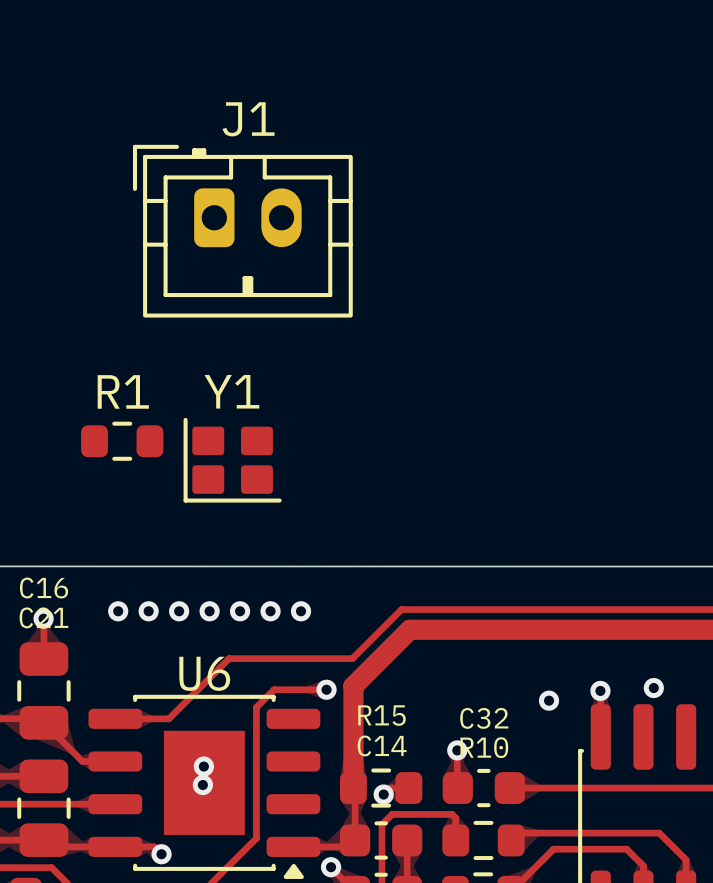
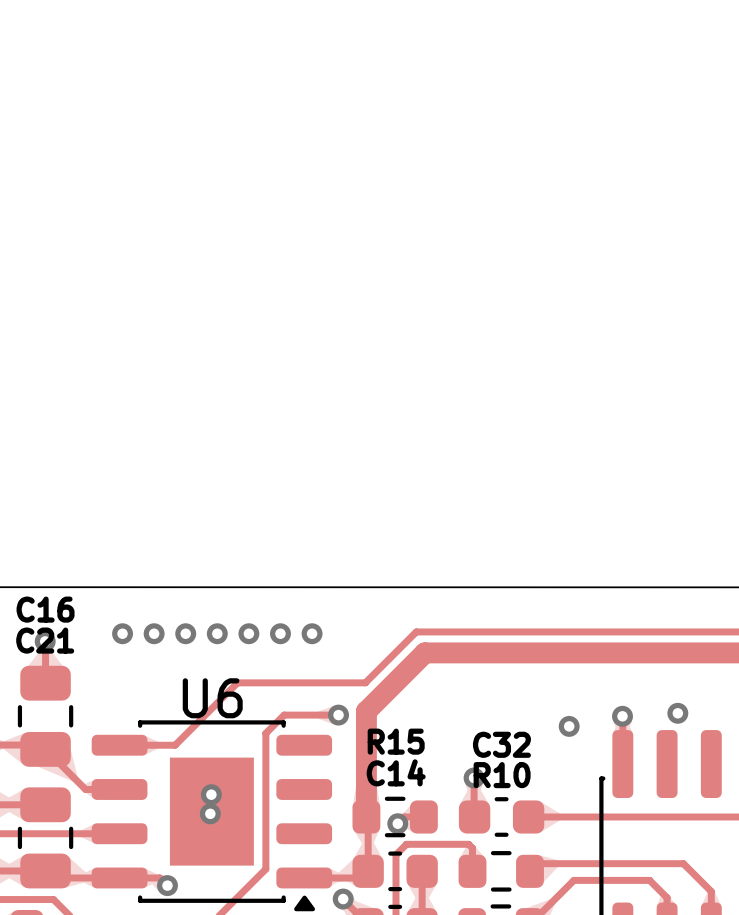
J1: (242, 231) -> none
R1: (122, 441) -> none
Y1: (232, 460) -> none

